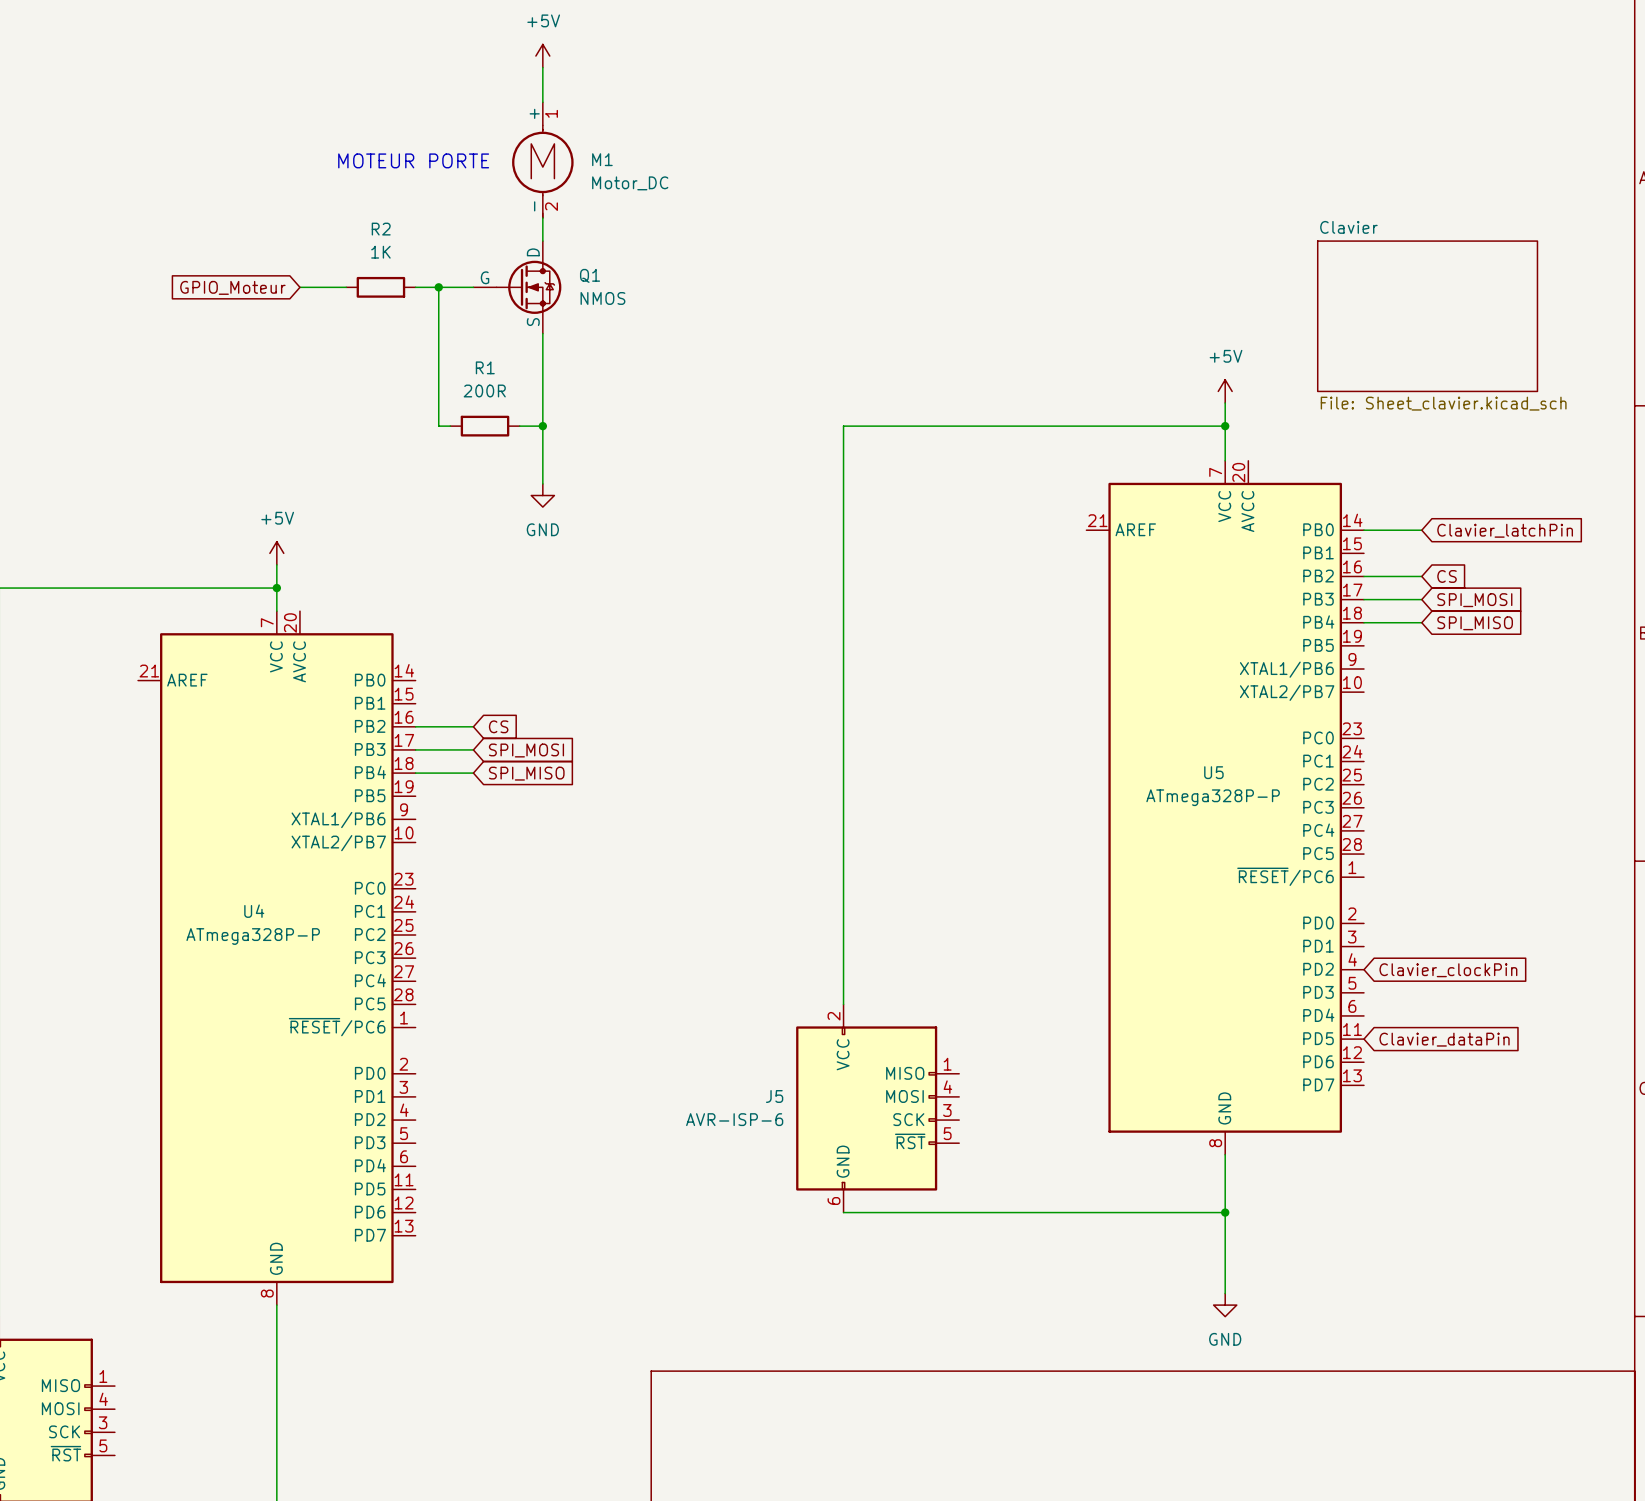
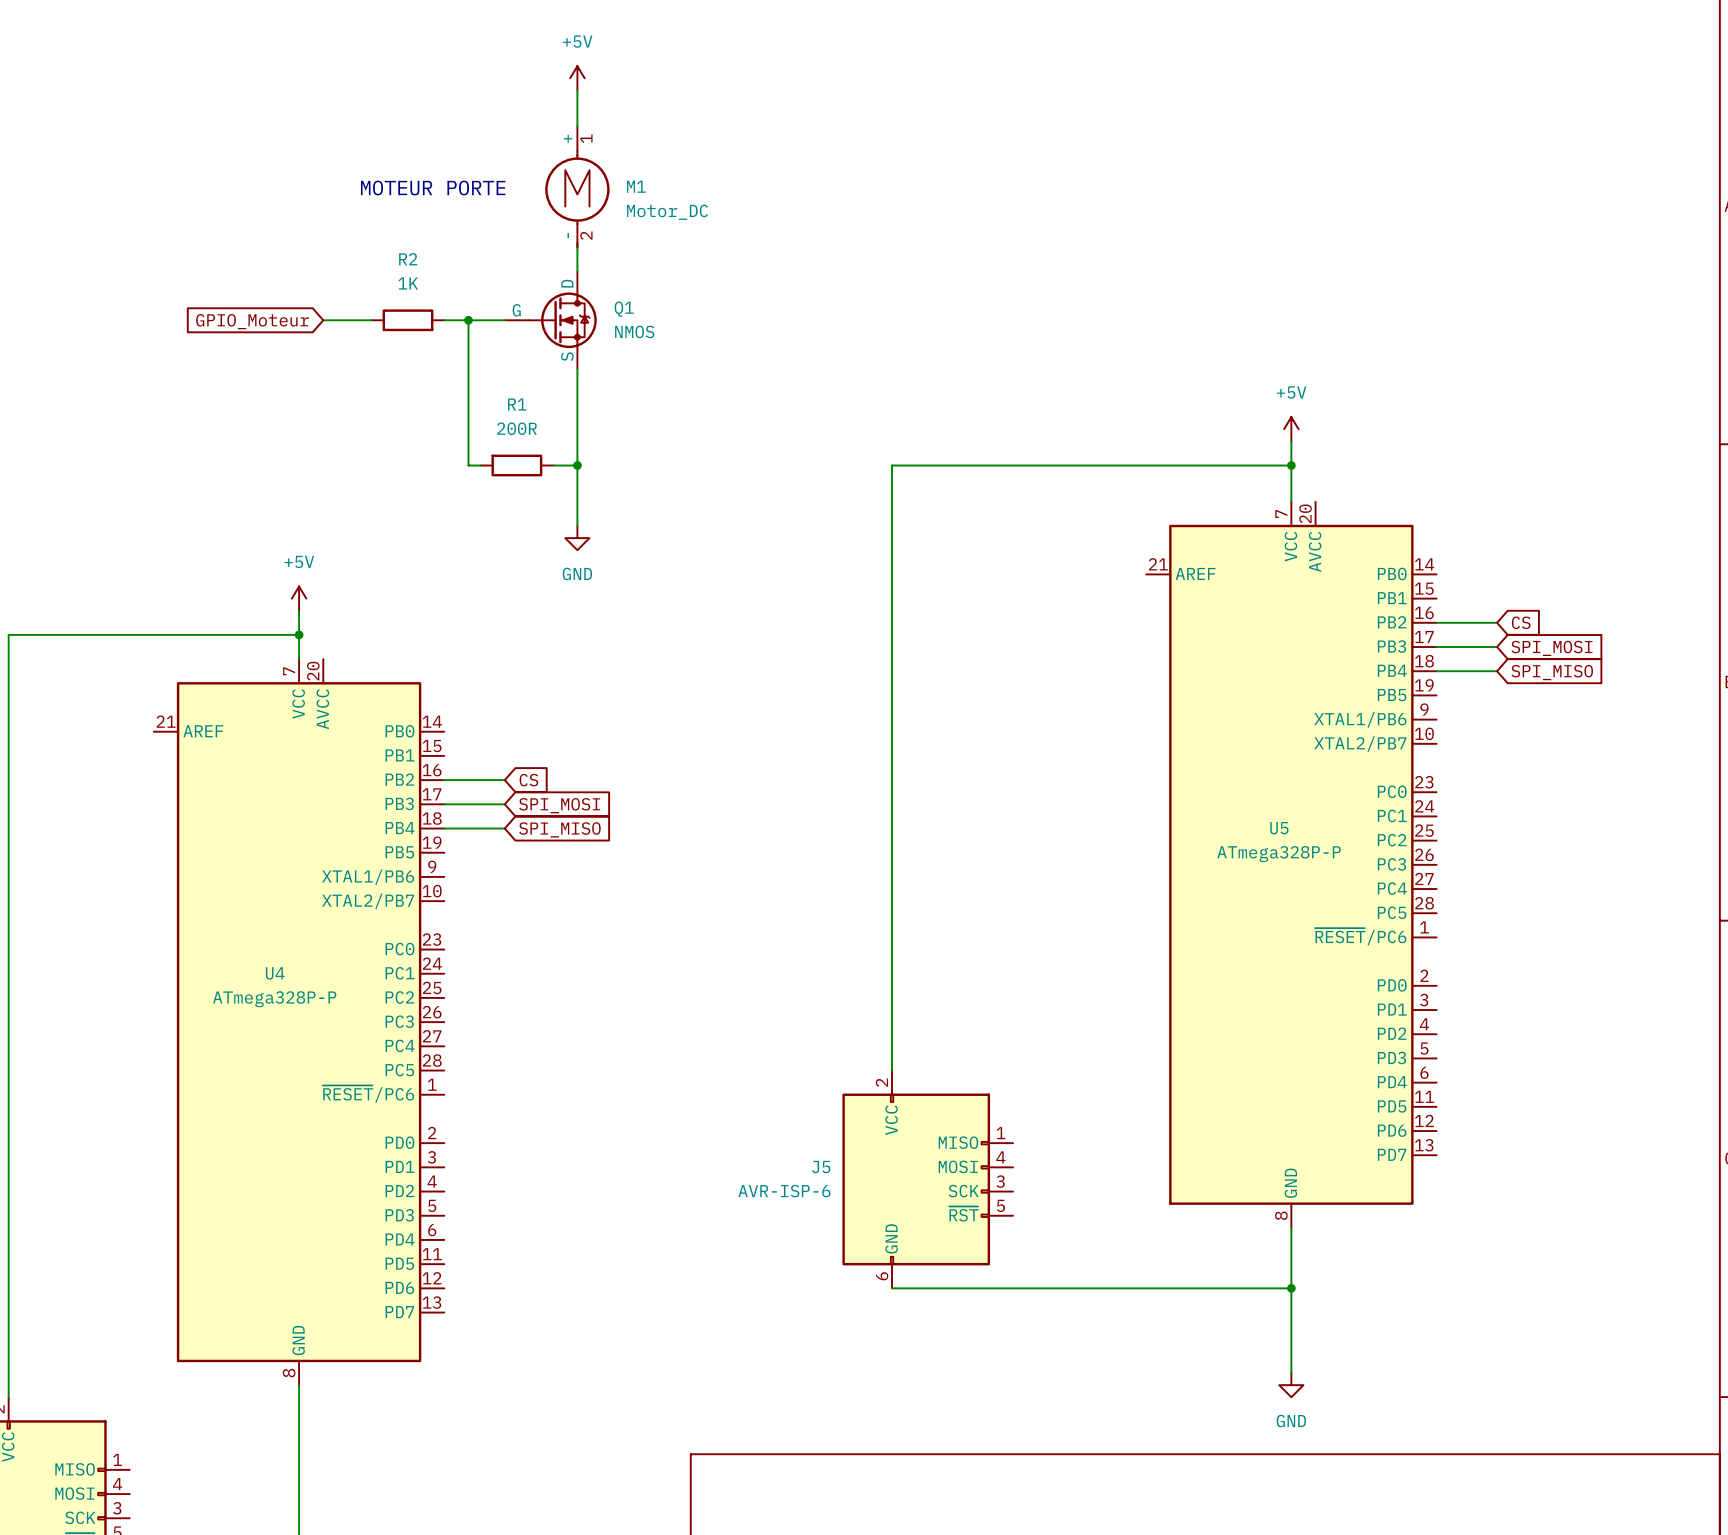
sheet Clavier: File: Sheet_clavier.kicad_sch (1427, 316) -> none
wire: (1363, 530) (1421, 530) -> none
global label: Clavier_latchPin (1505, 530) -> none
global label: Clavier_clockPin (1448, 970) -> none
global label: Clavier_dataPin (1444, 1039) -> none

